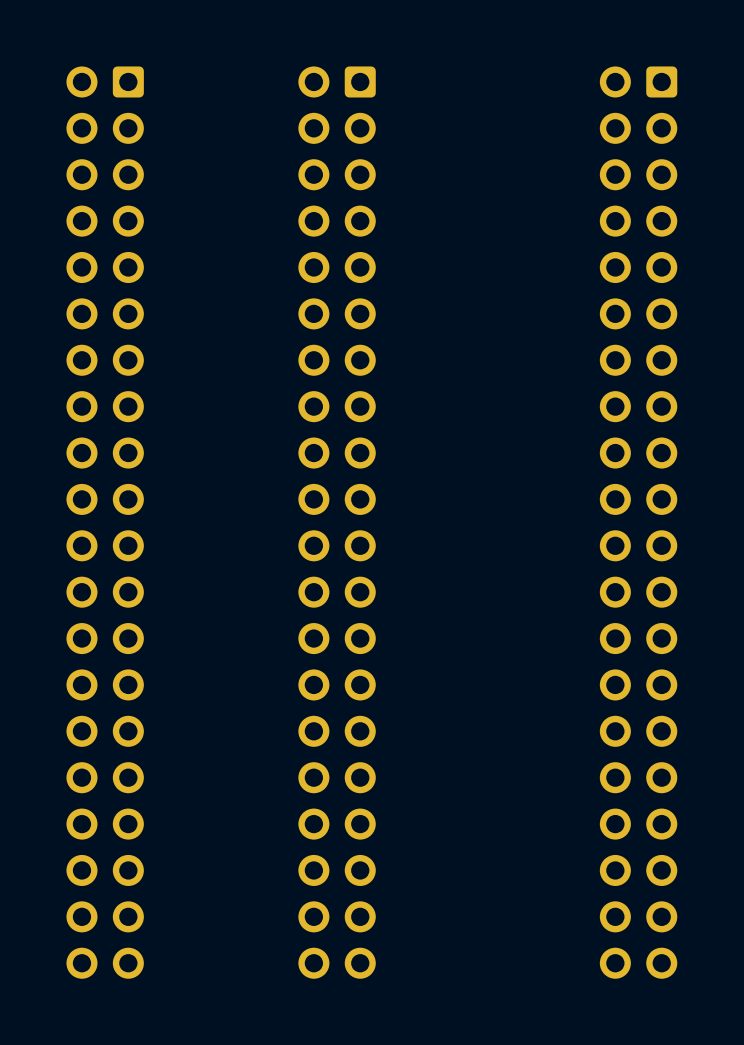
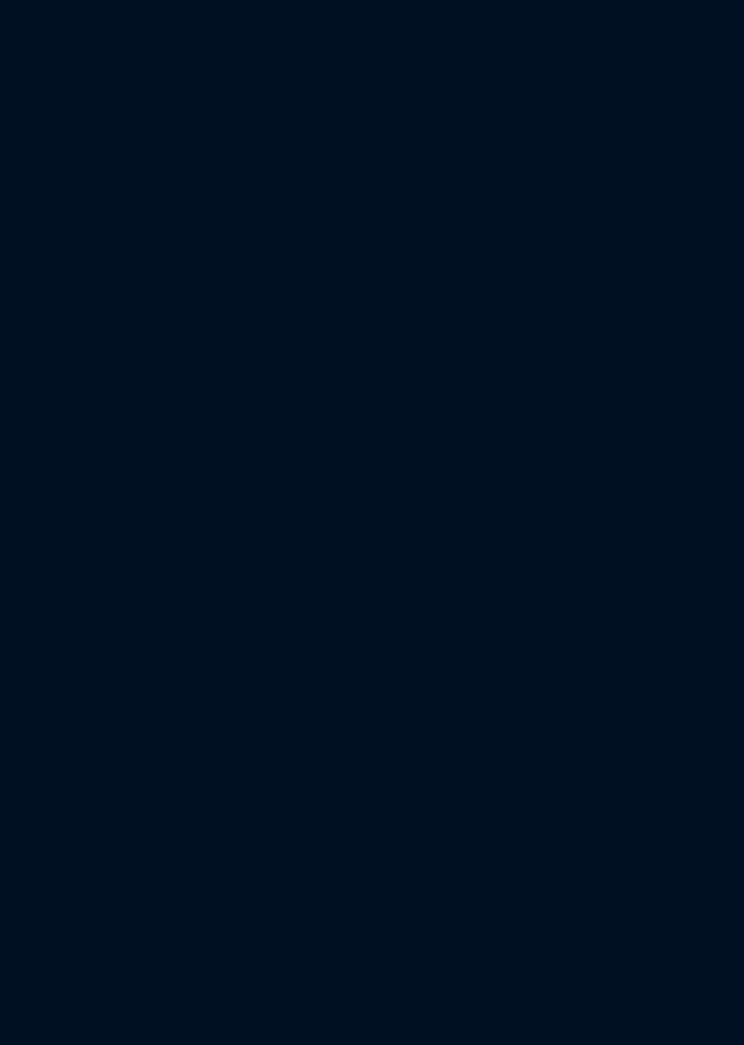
part: (105, 522) -> none
part: (337, 522) -> none
part: (638, 522) -> none

